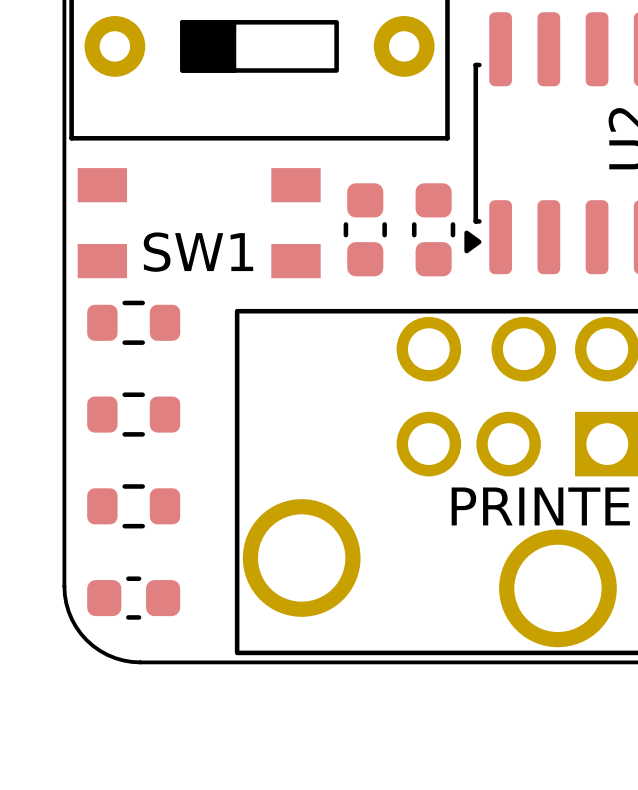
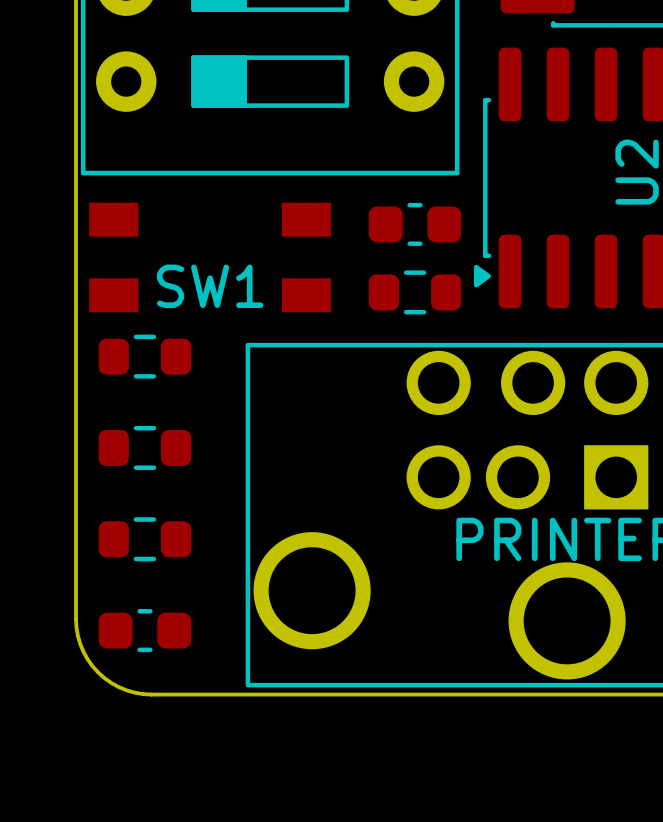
part: none -> (415, 224)
part: (365, 229) -> none
part: (433, 229) -> none
part: none -> (415, 292)

